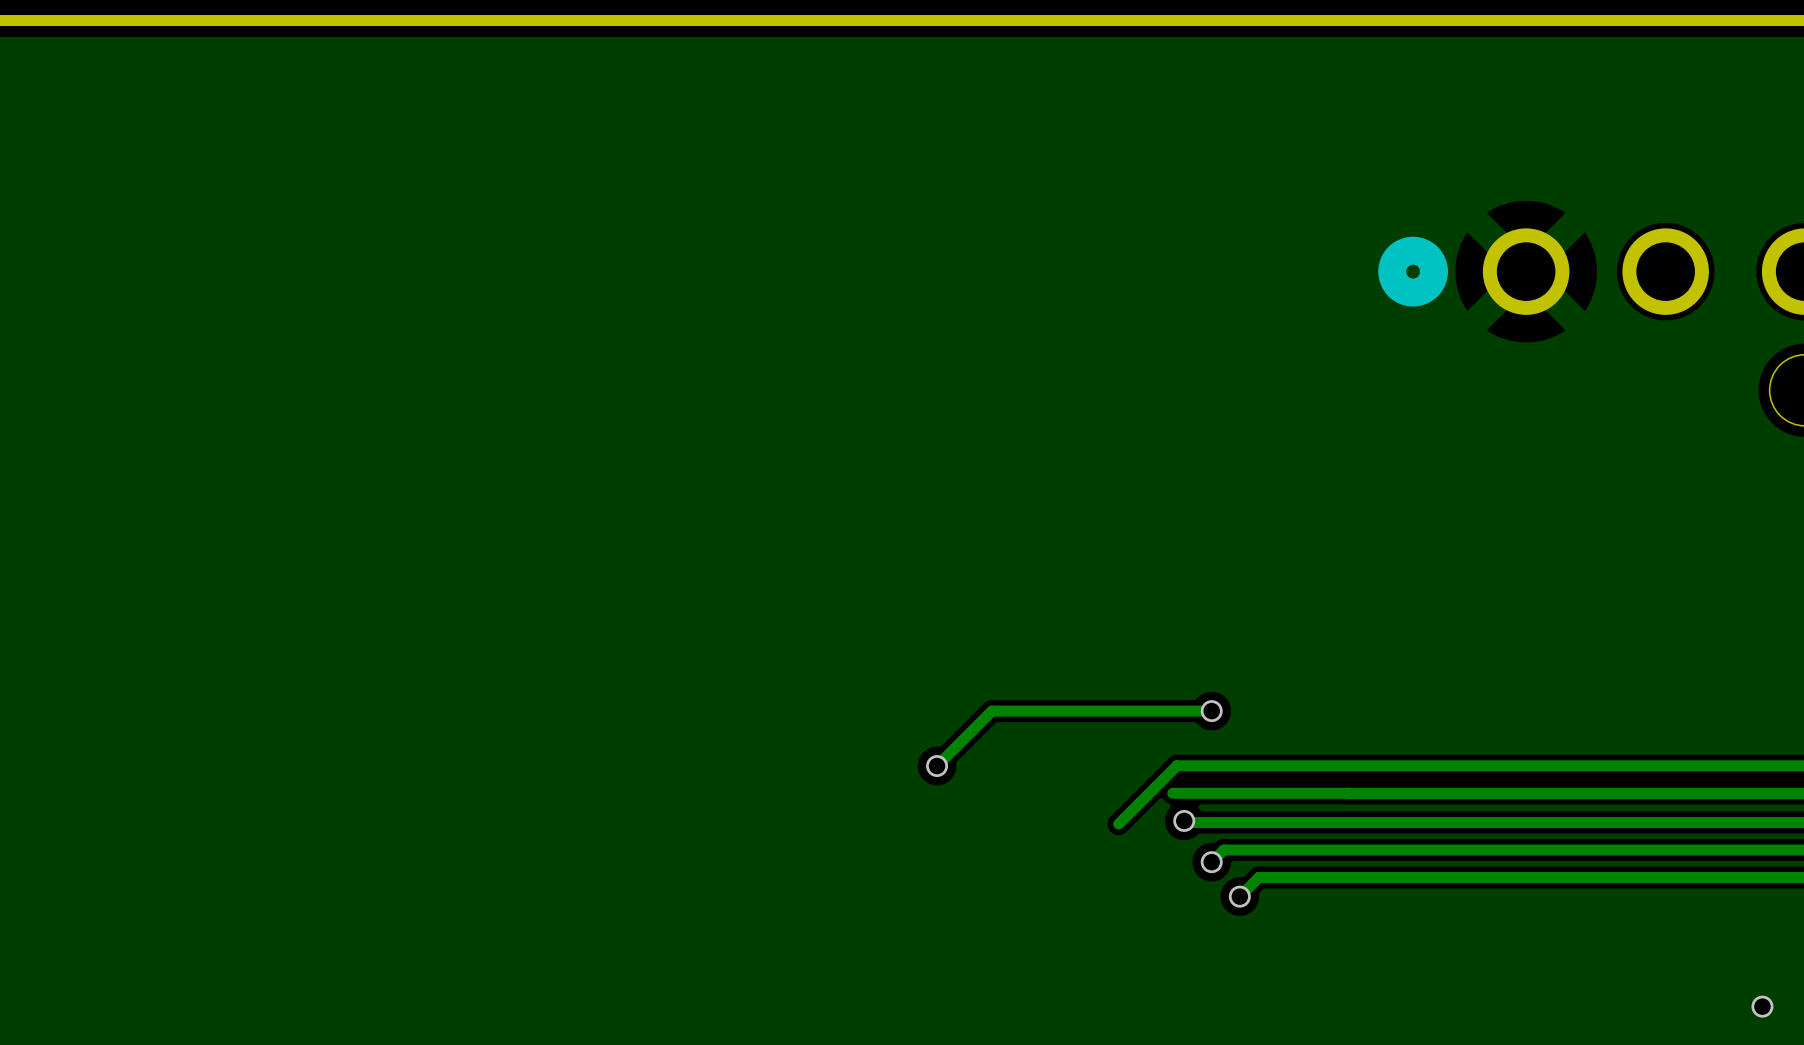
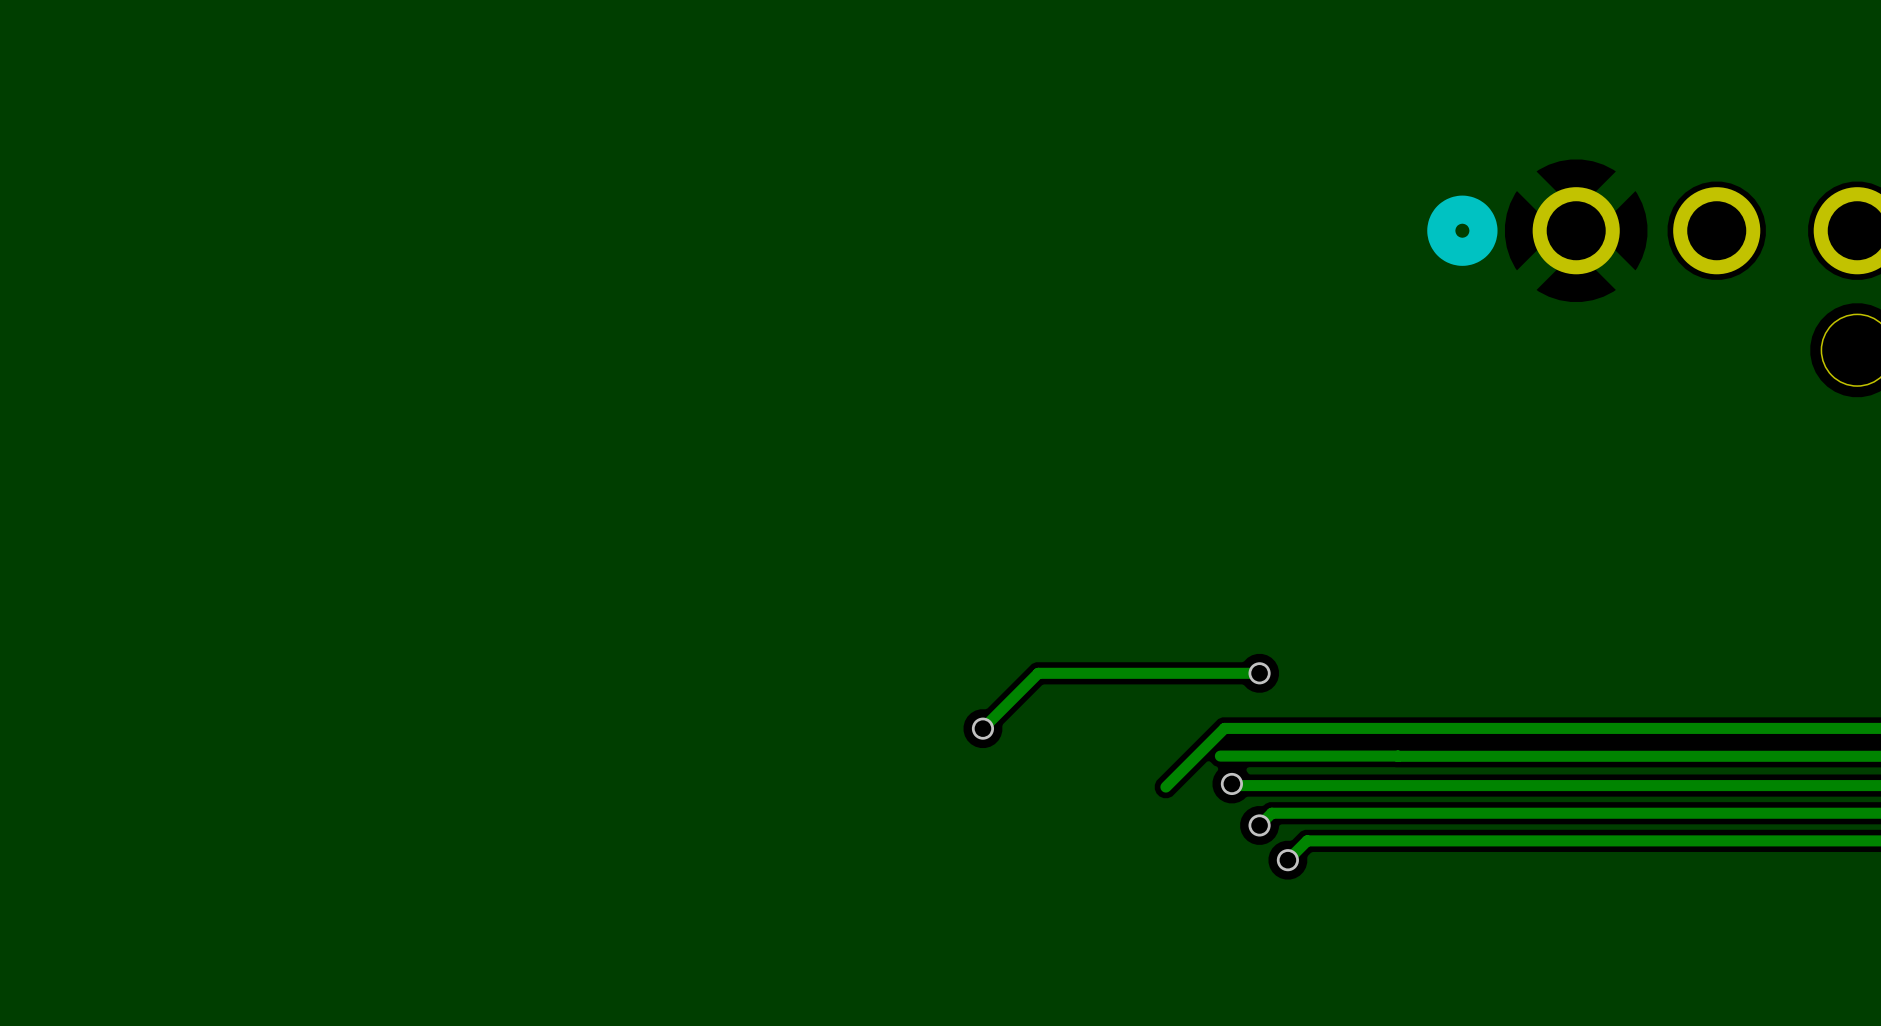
via: (1762, 1006) -> none

